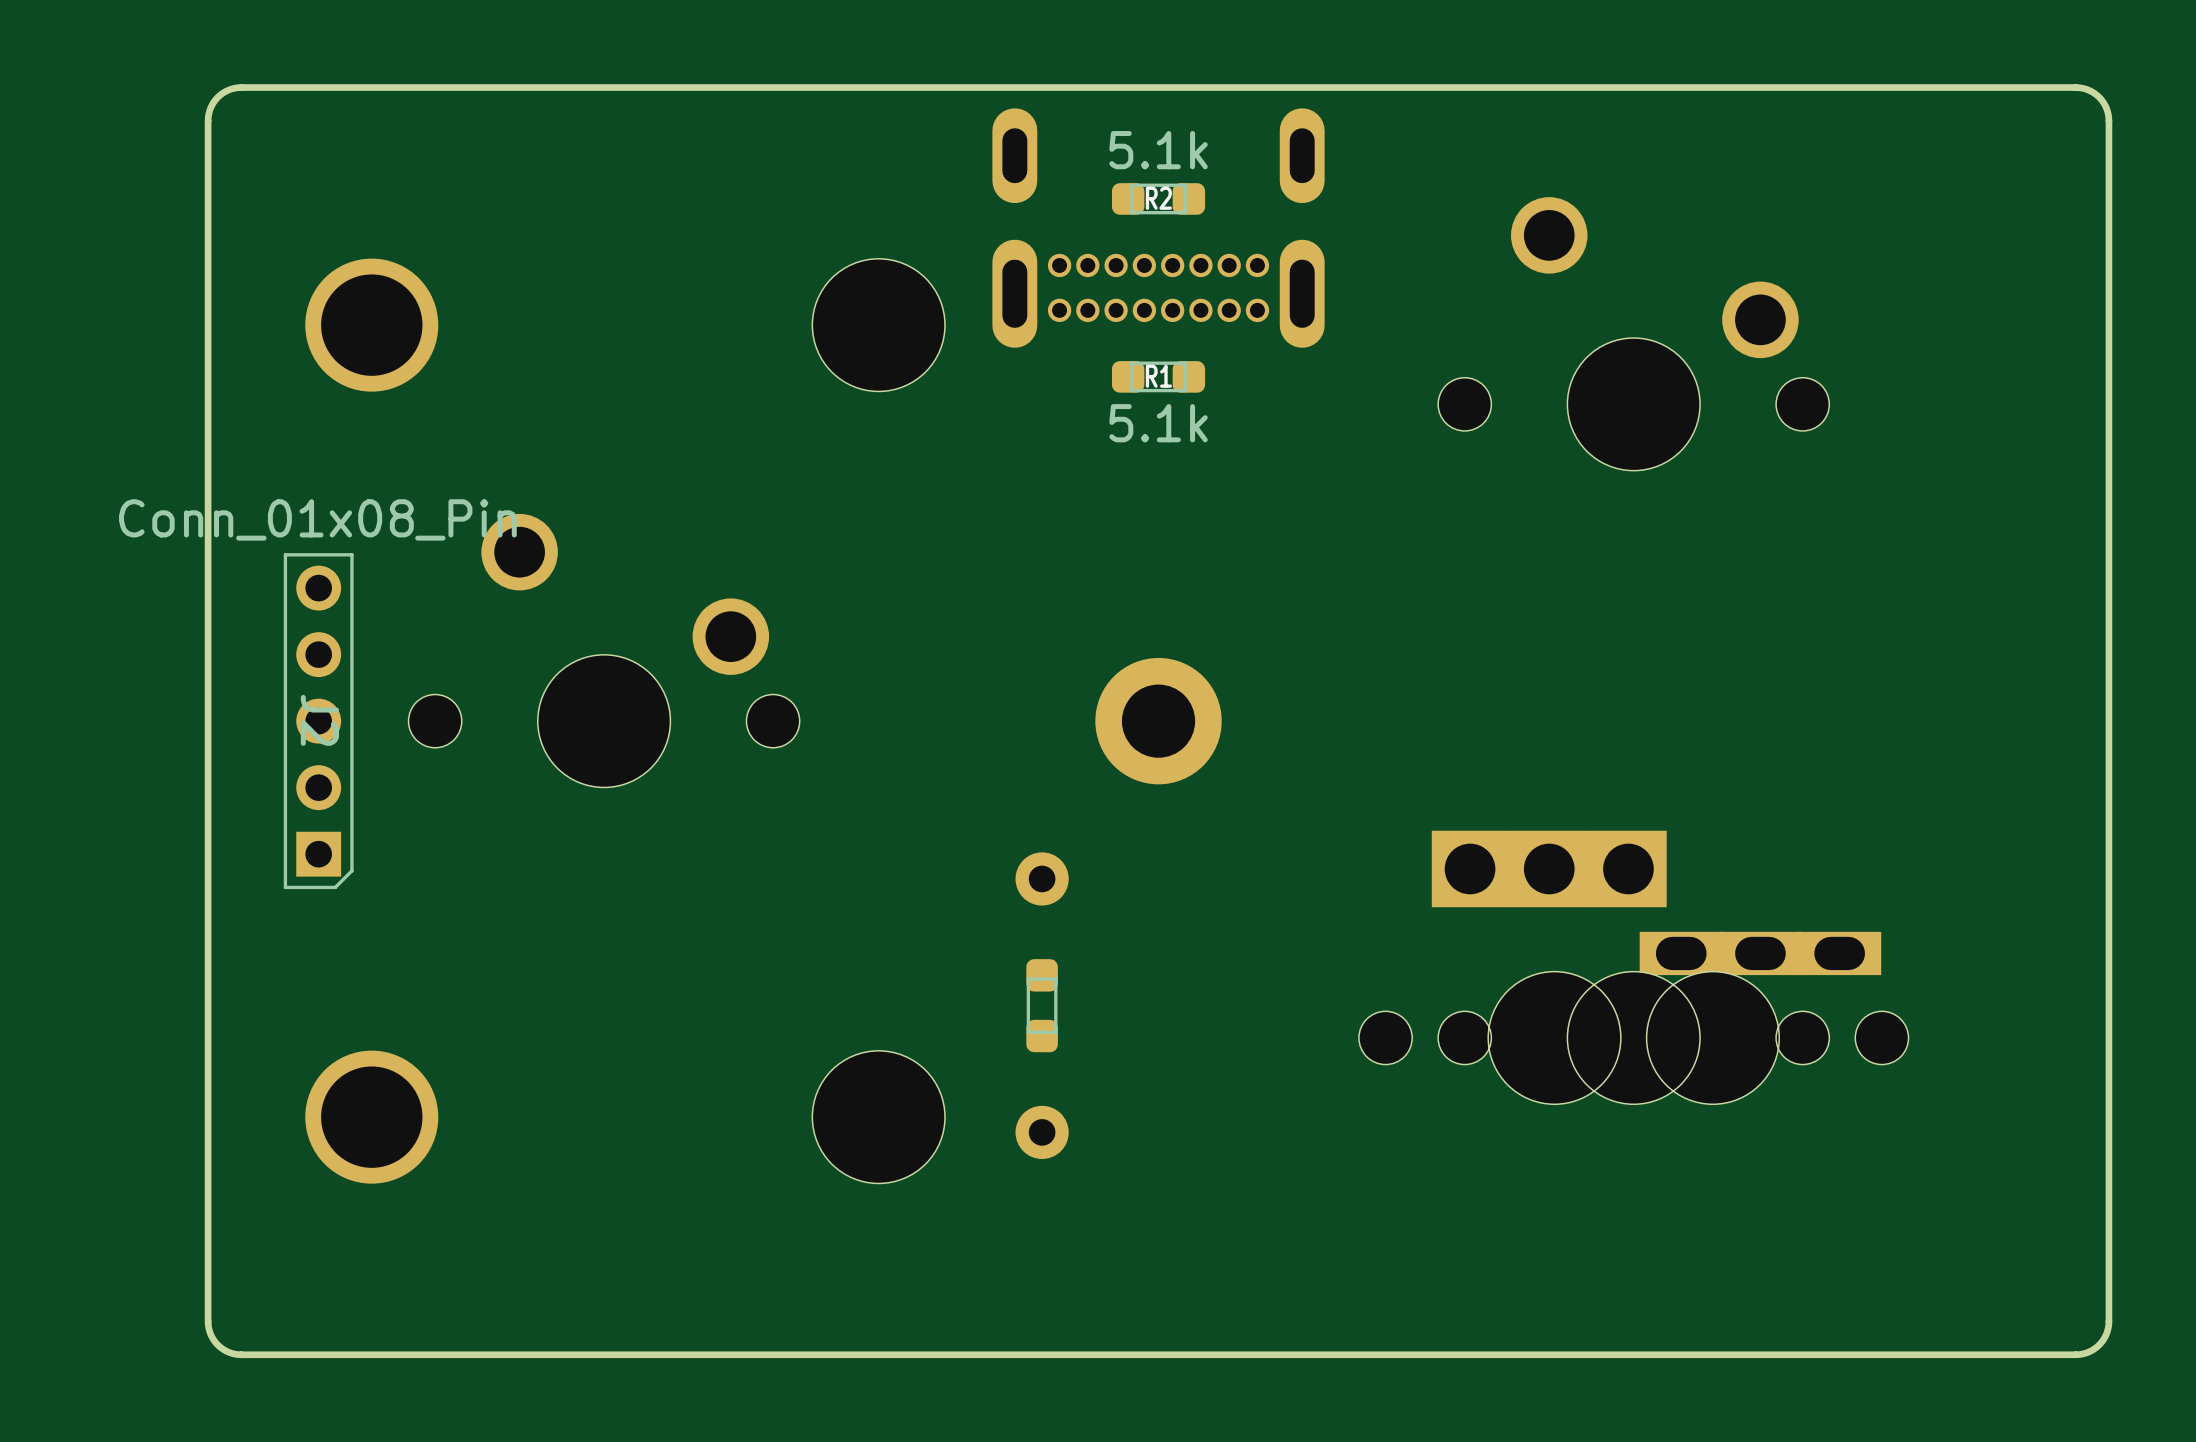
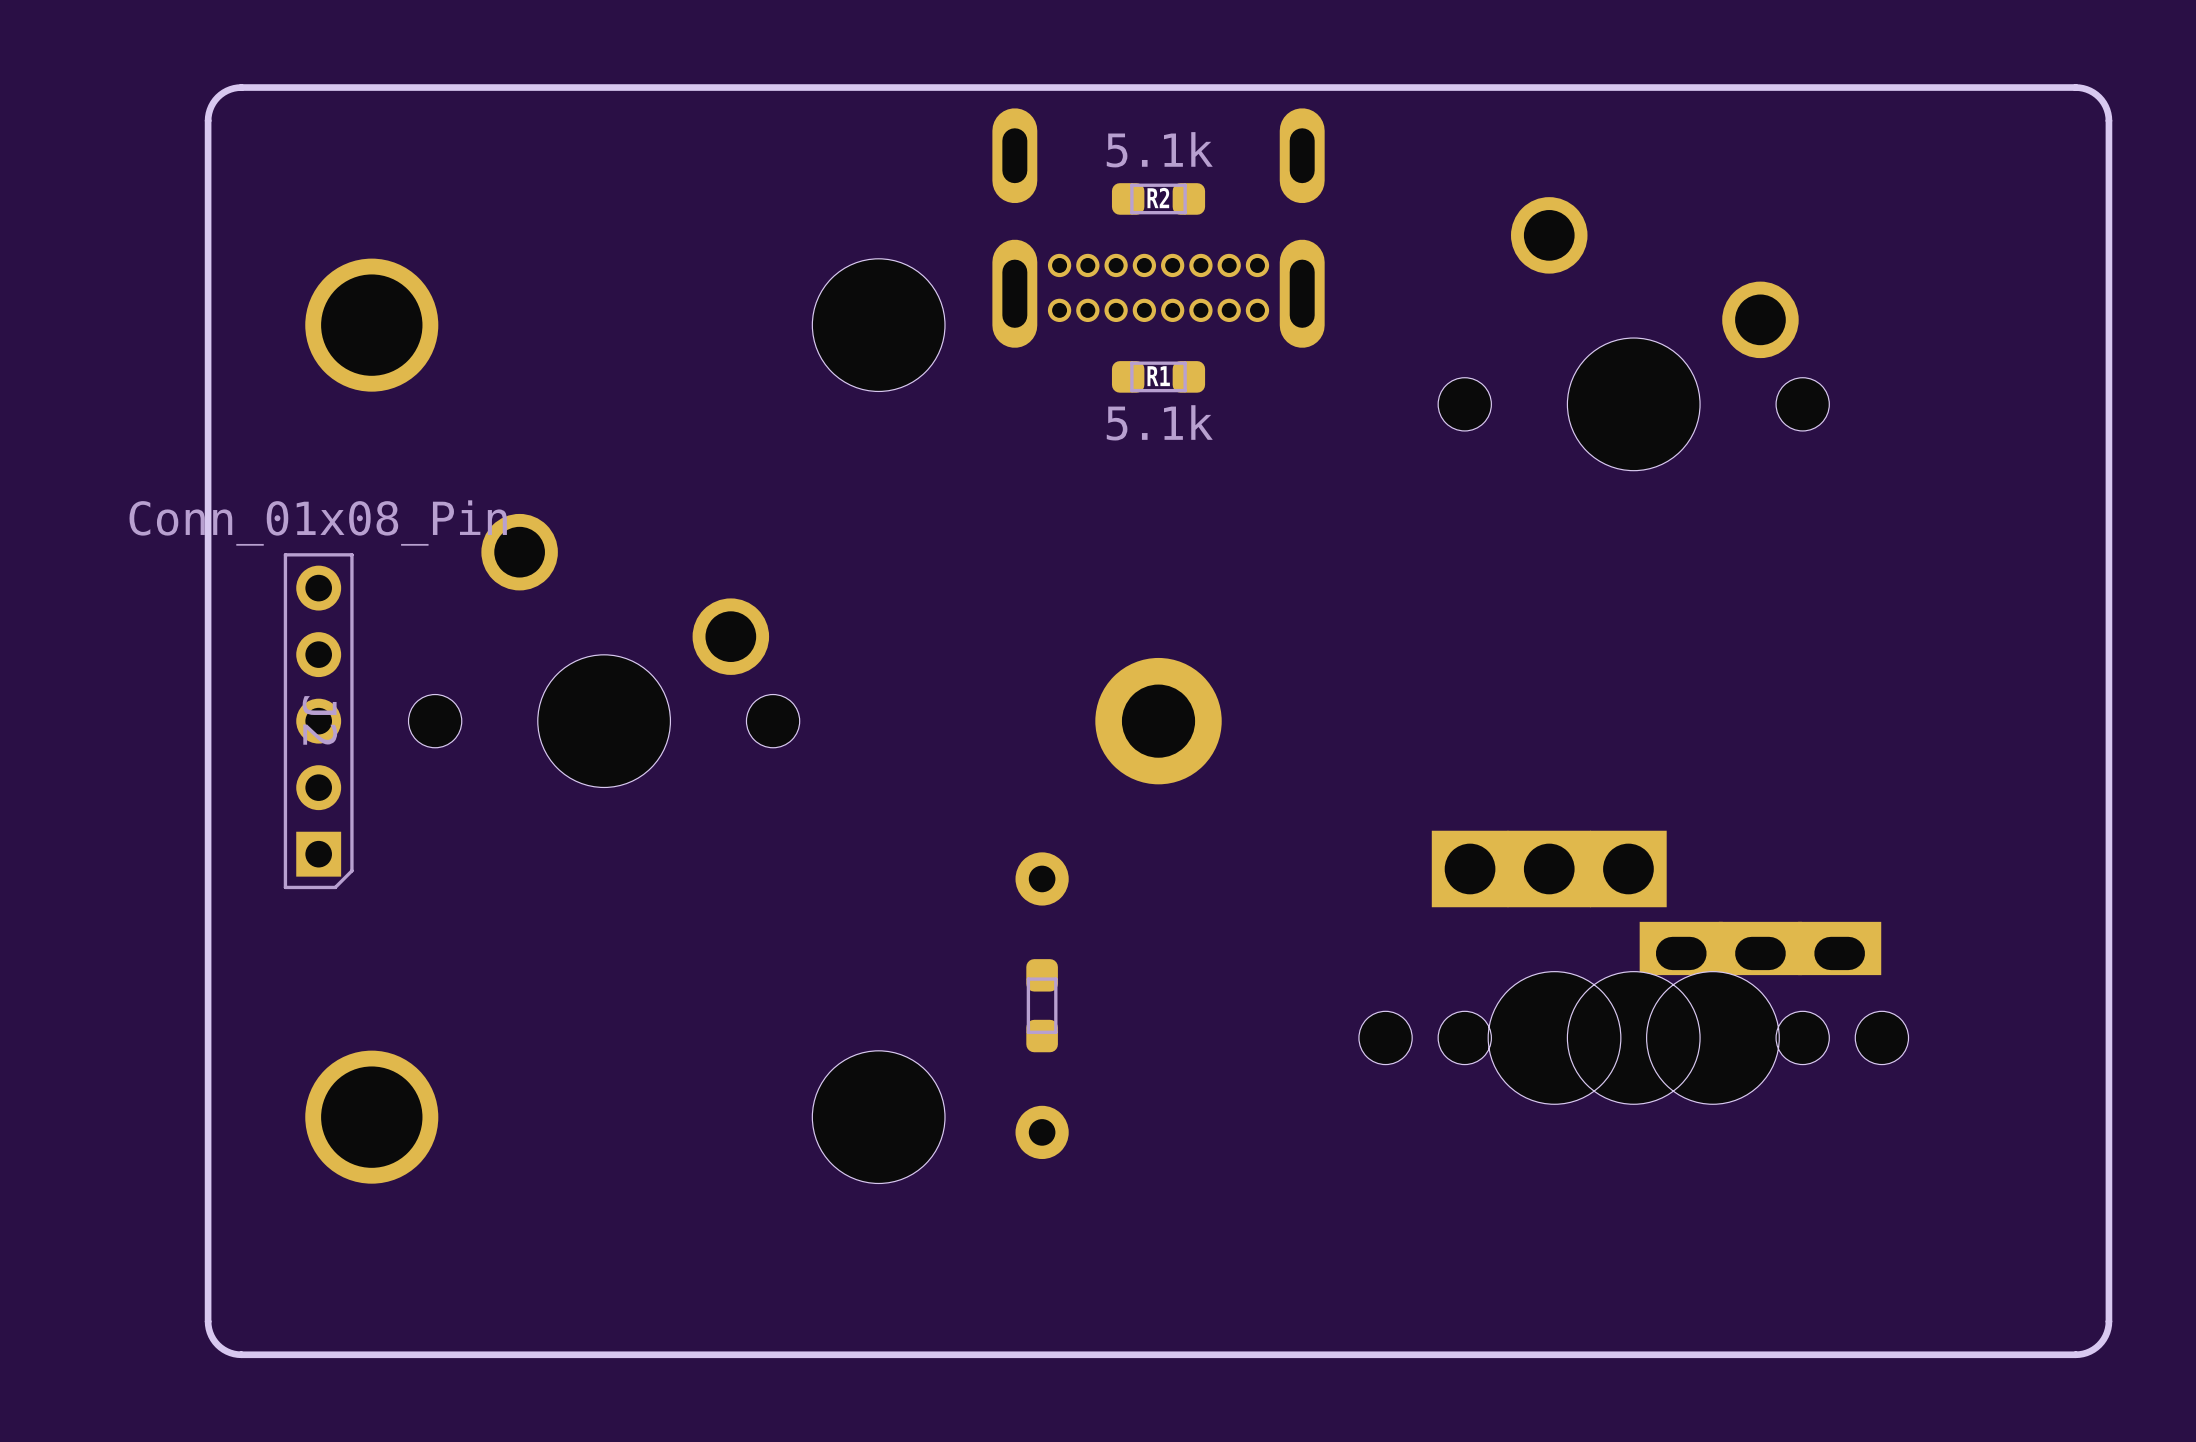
part footprint: [1358, 830, 1723, 1105] -> [1358, 830, 1723, 1105]
part footprint: [1438, 830, 1830, 1105] -> [1438, 830, 1830, 1105]
part footprint: [1590, 830, 1909, 1105] -> [1590, 830, 1909, 1105]

